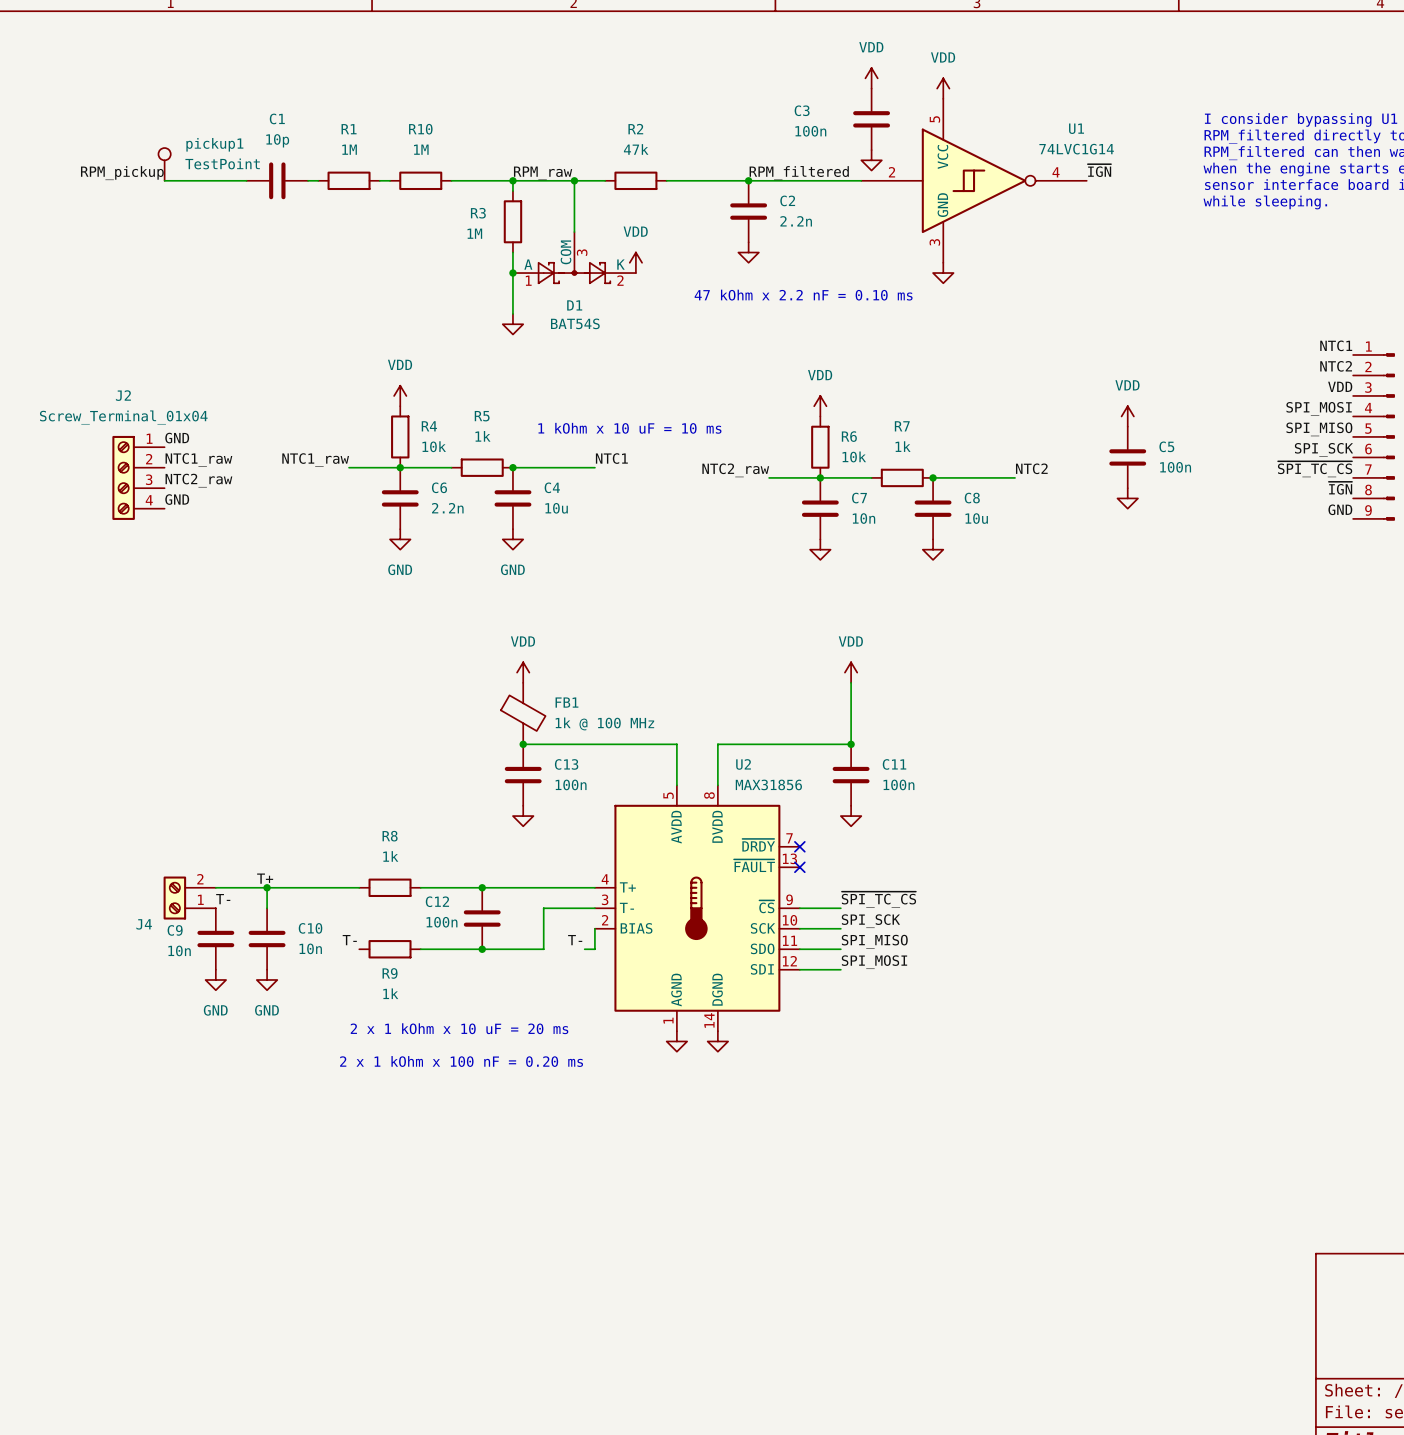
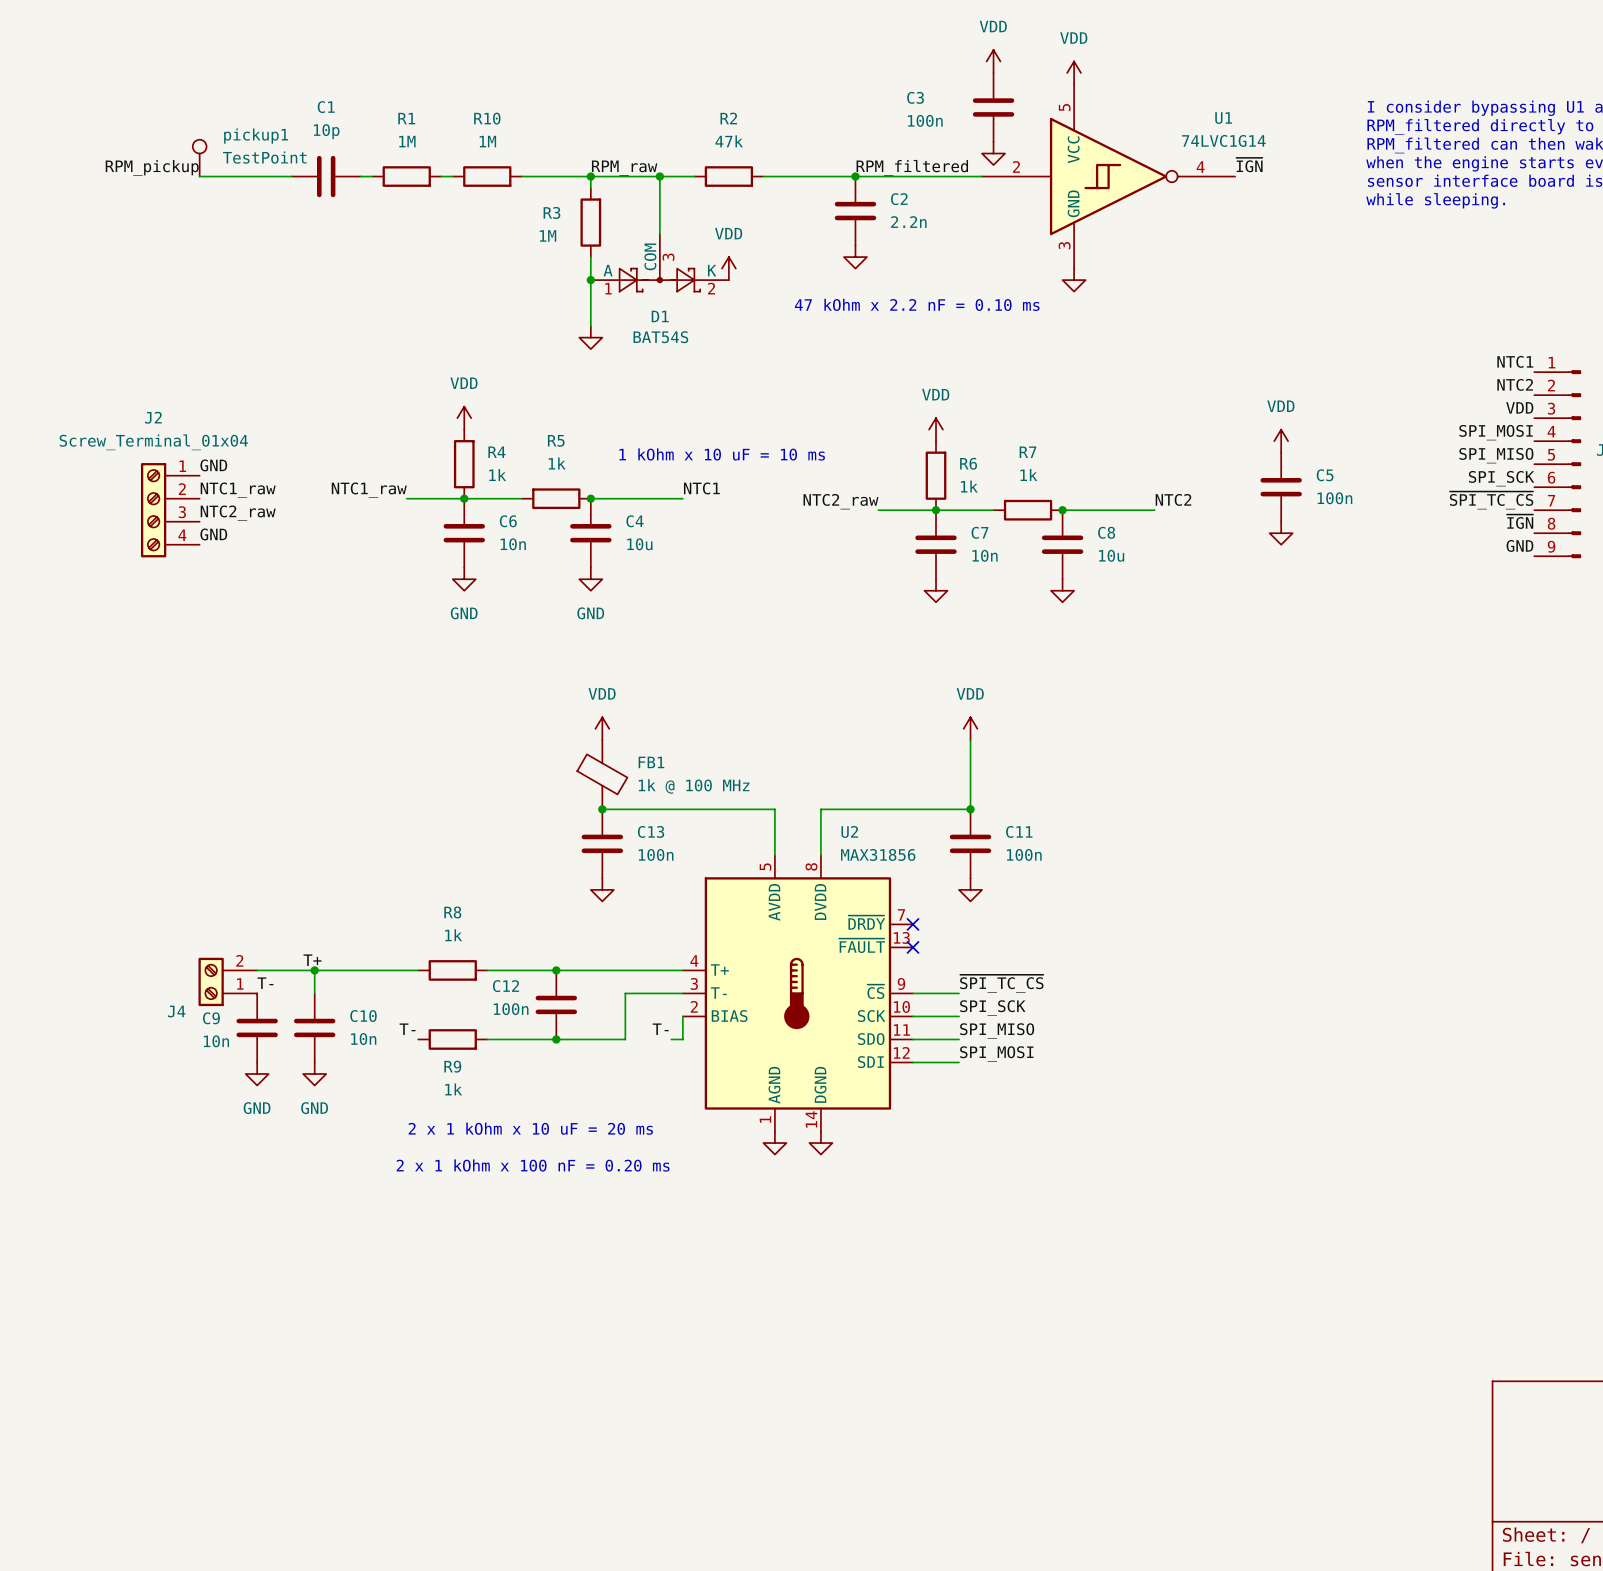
R4 value: 10k (434, 446) -> 1k (497, 475)
R6 value: 10k (854, 456) -> 1k (969, 486)
C6 value: 2.2n (447, 508) -> 10n (513, 544)

